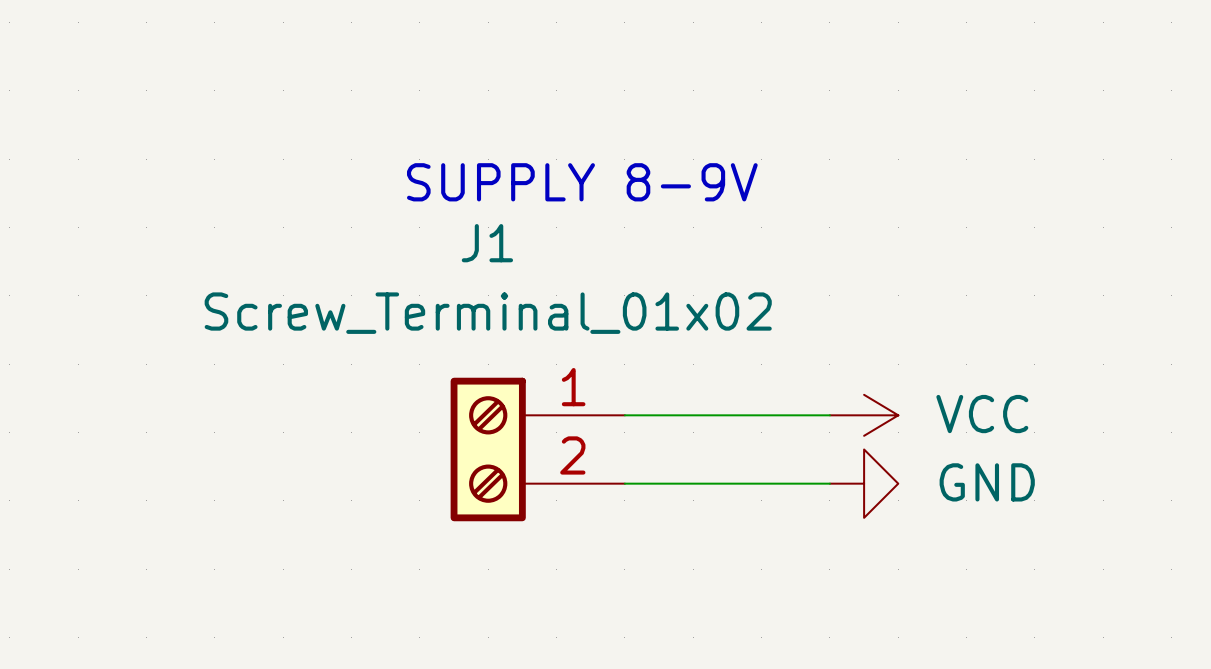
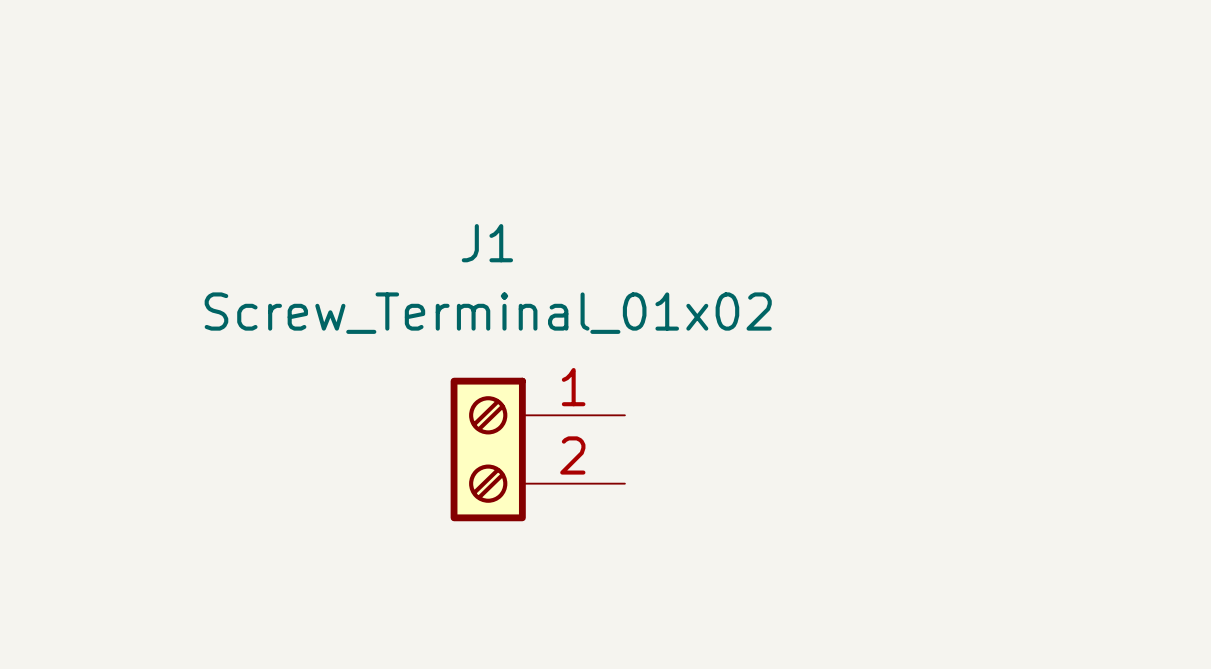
text: SUPPLY 8-9V (582, 182) -> none
wire: (624, 415) (829, 415) -> none
power symbol: VCC (864, 415) -> none
wire: (624, 483) (829, 483) -> none
power symbol: GND (864, 483) -> none

